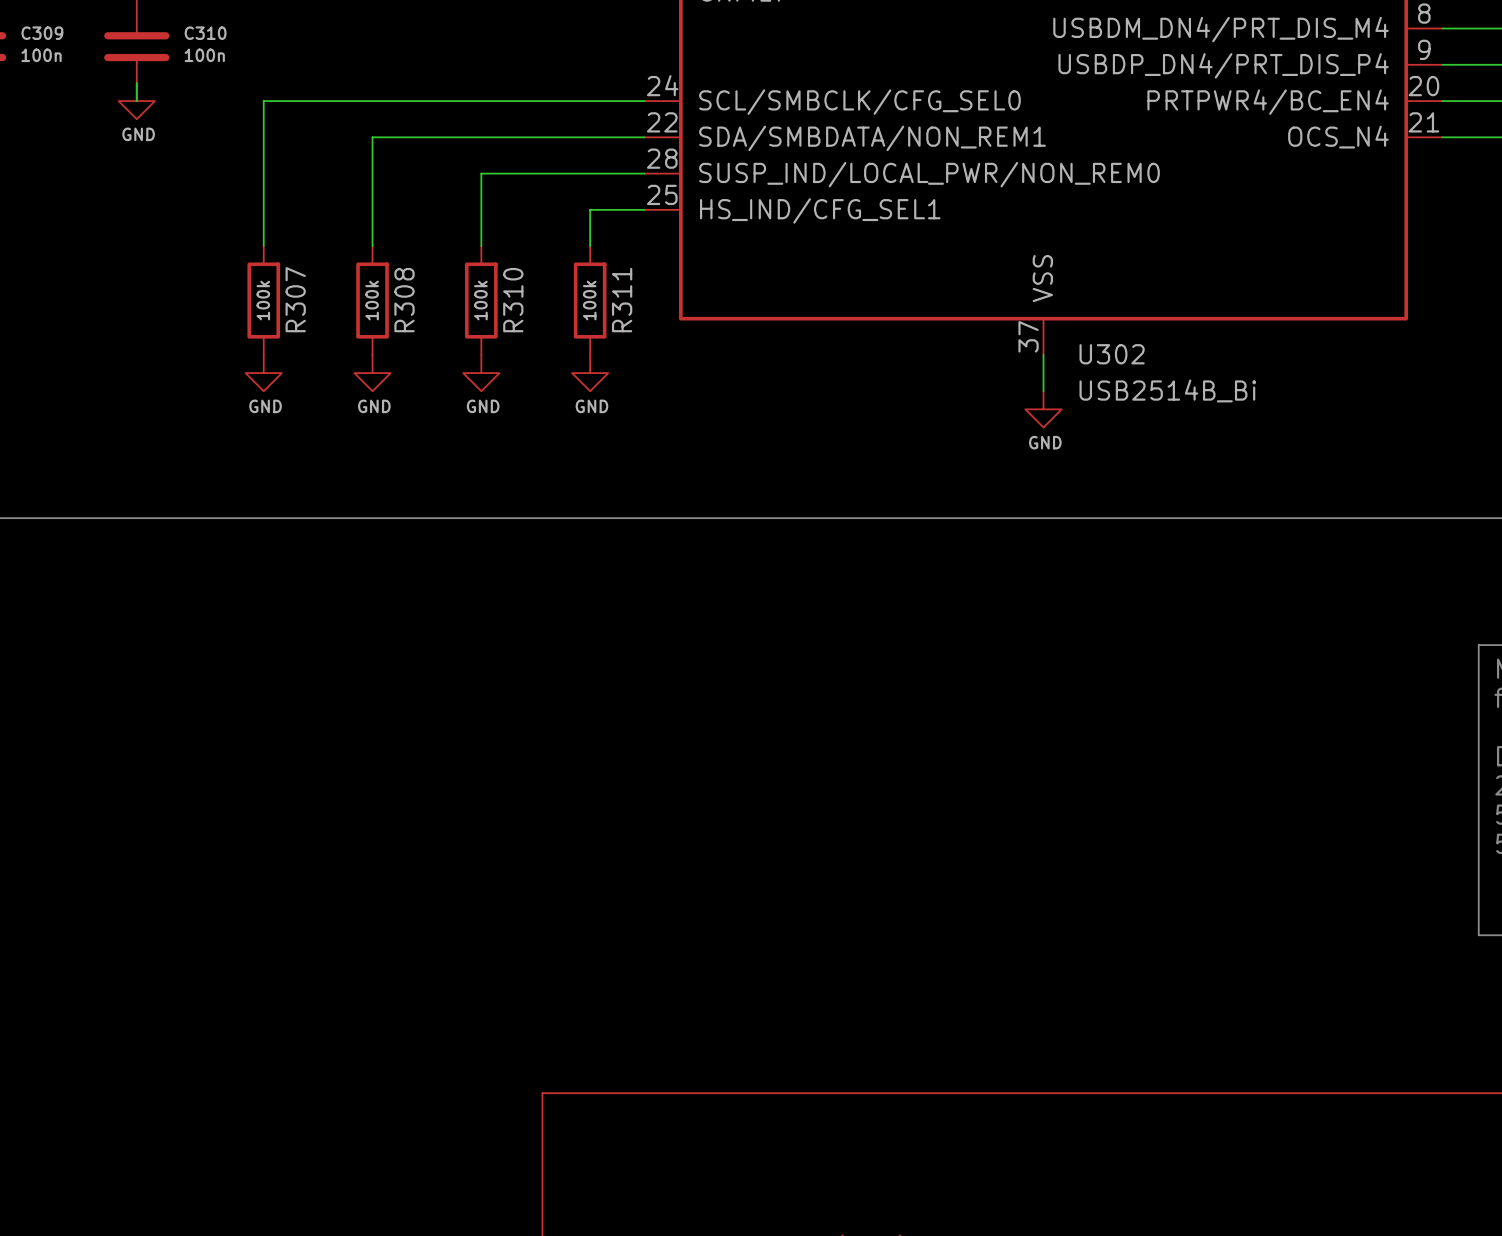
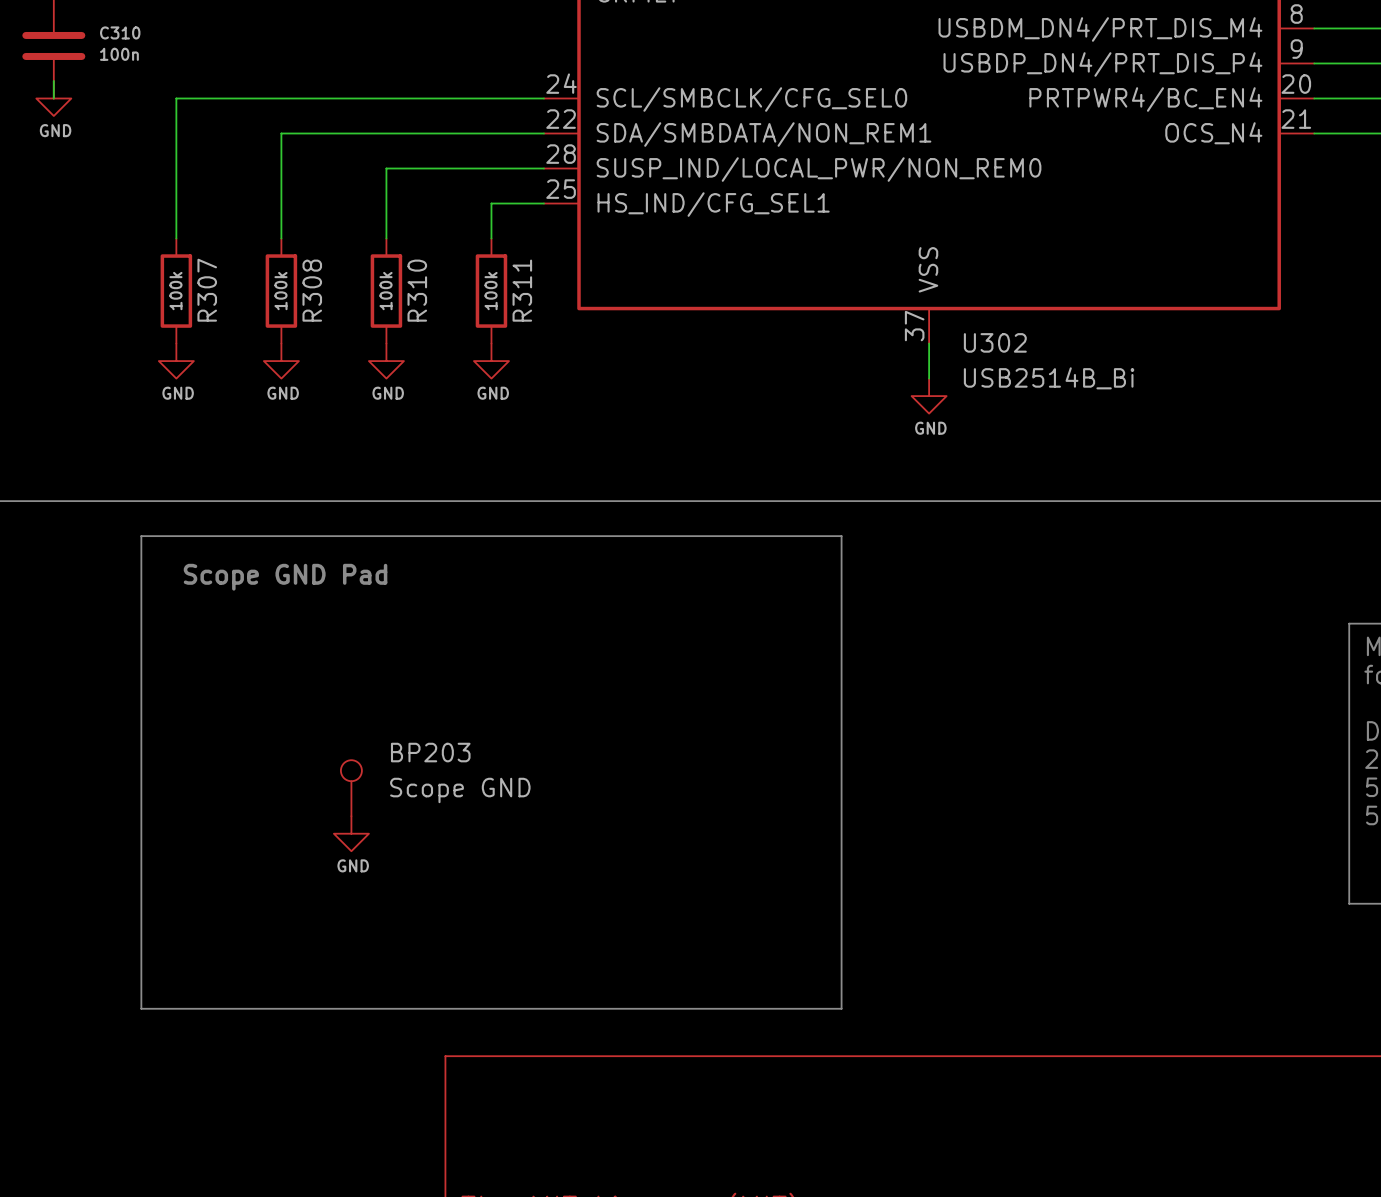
line: none -> (141, 536) (841, 536) (841, 1008) (141, 1008) (141, 536)
text: none -> Scope GND Pad (285, 577)
BP203: none -> Scope GND (351, 788)
power symbol: none -> GND (351, 833)

